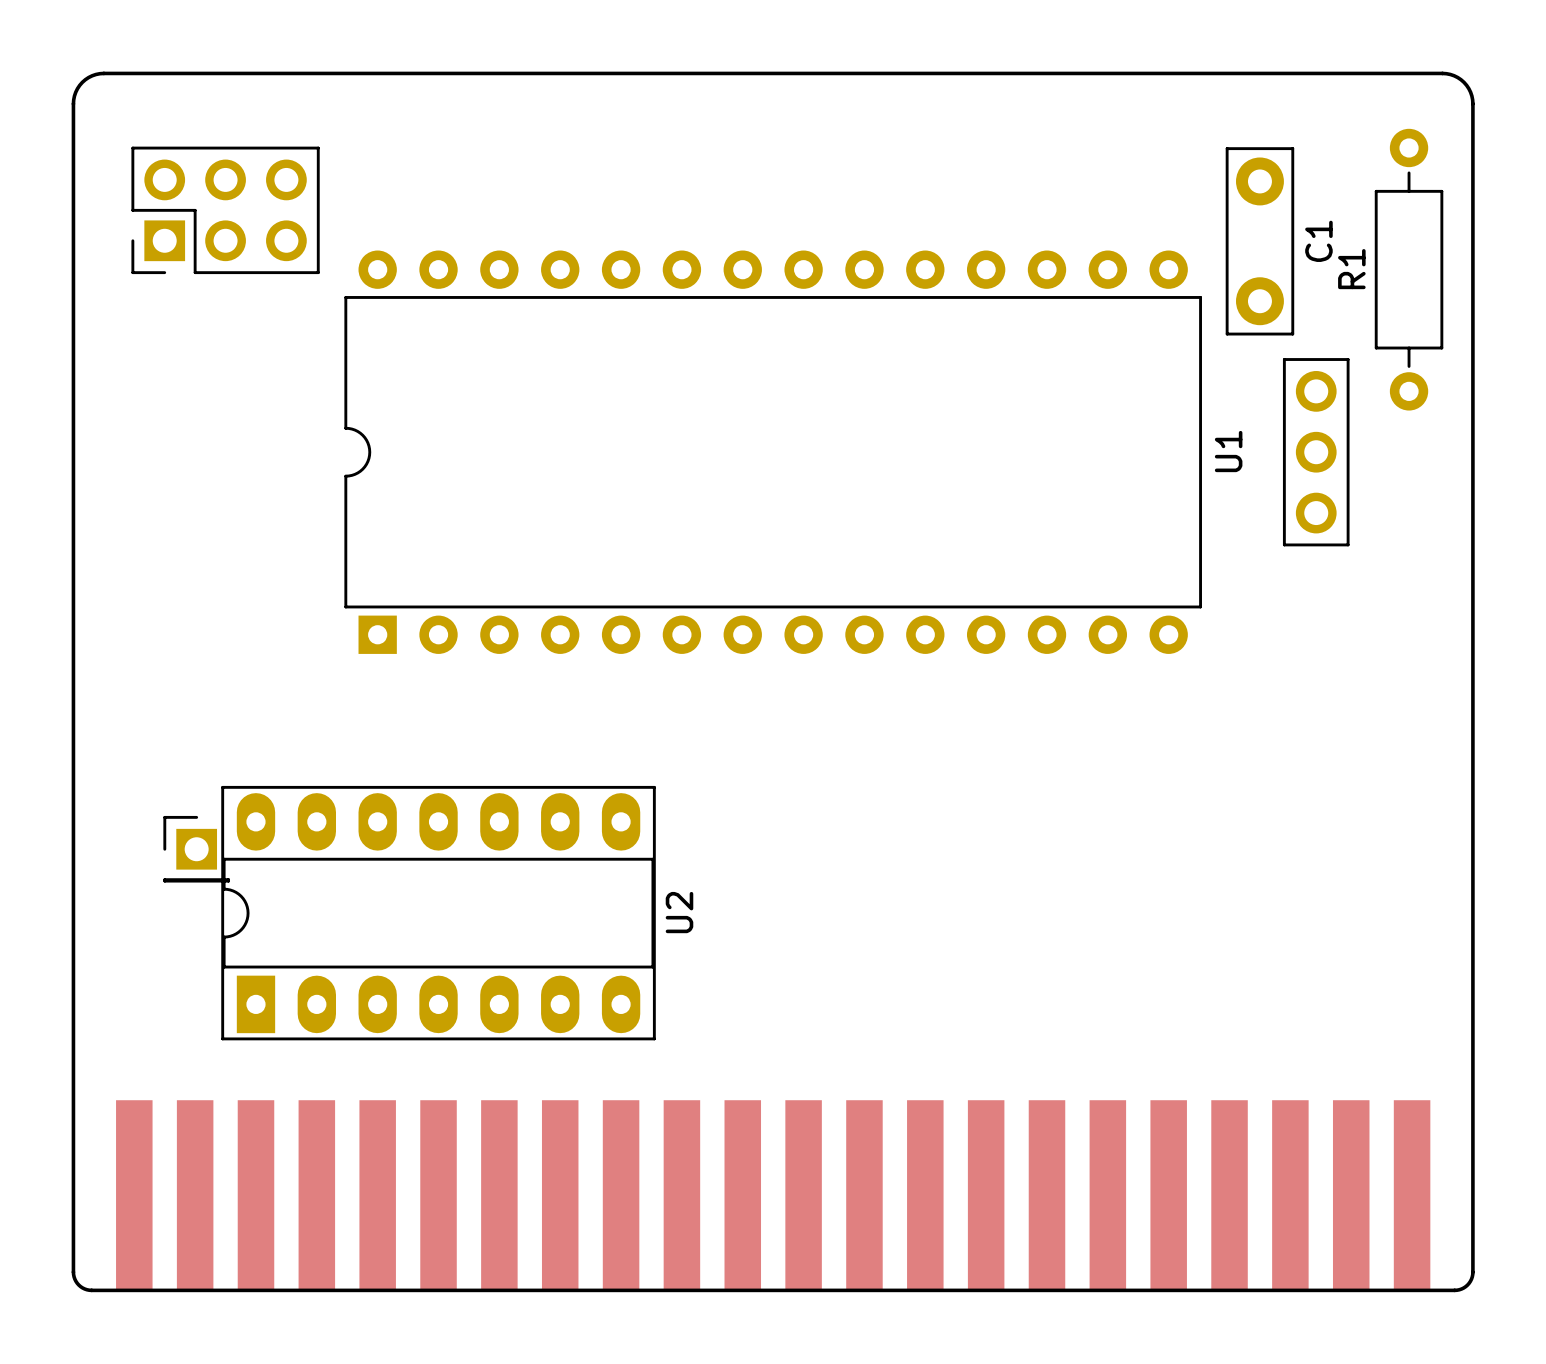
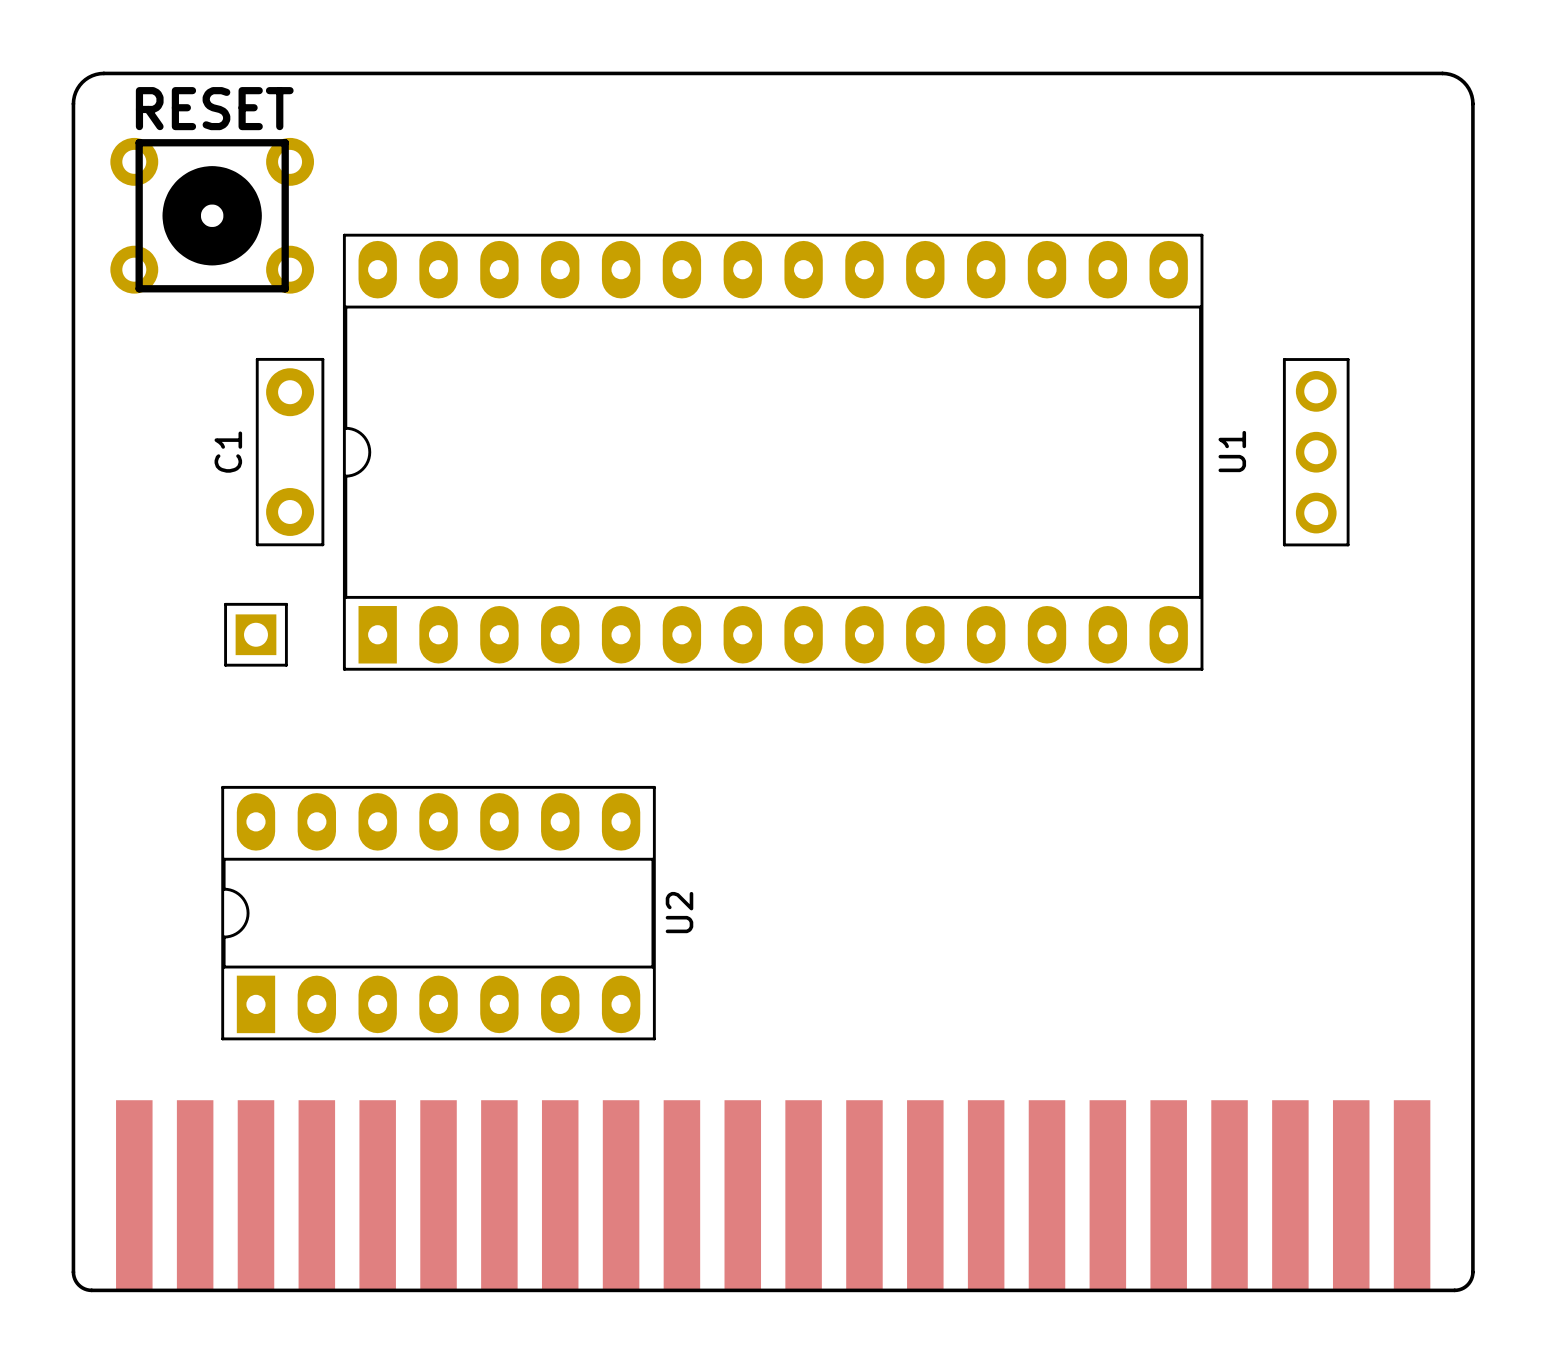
text: none -> RESET (214, 108)
part footprint: [131, 146, 320, 275] -> [110, 137, 315, 294]
C1 position: (1259, 241) -> (290, 452)
C1 name position: C1 (1318, 241) -> C1 (228, 452)
U1 footprint: [344, 250, 1202, 654] -> [342, 233, 1204, 671]
R1: (1409, 269) -> none
part: none -> (255, 634)
part: (196, 849) -> none

